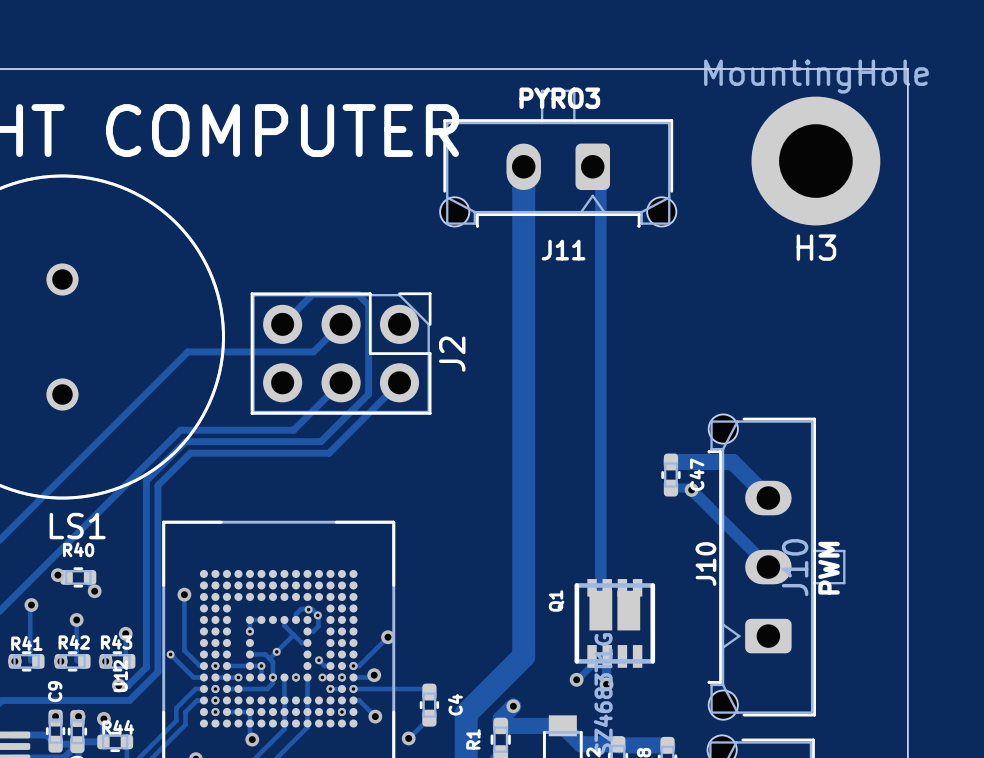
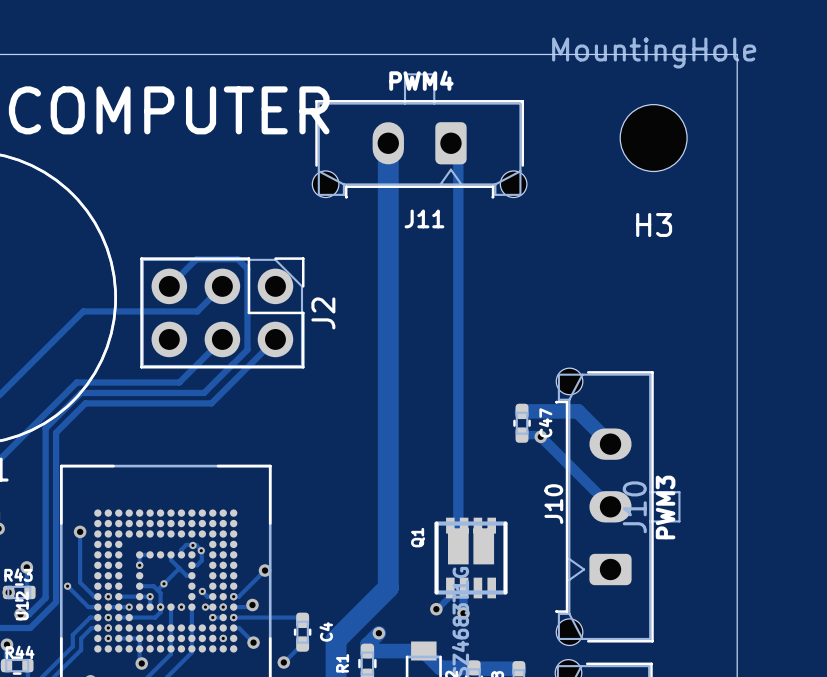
H3 footprint: [751, 96, 881, 226] -> [620, 104, 688, 172]
text: PYRO3 (559, 98) -> PWM4 (421, 80)
text: PWM (829, 568) -> PWM3 (665, 507)

